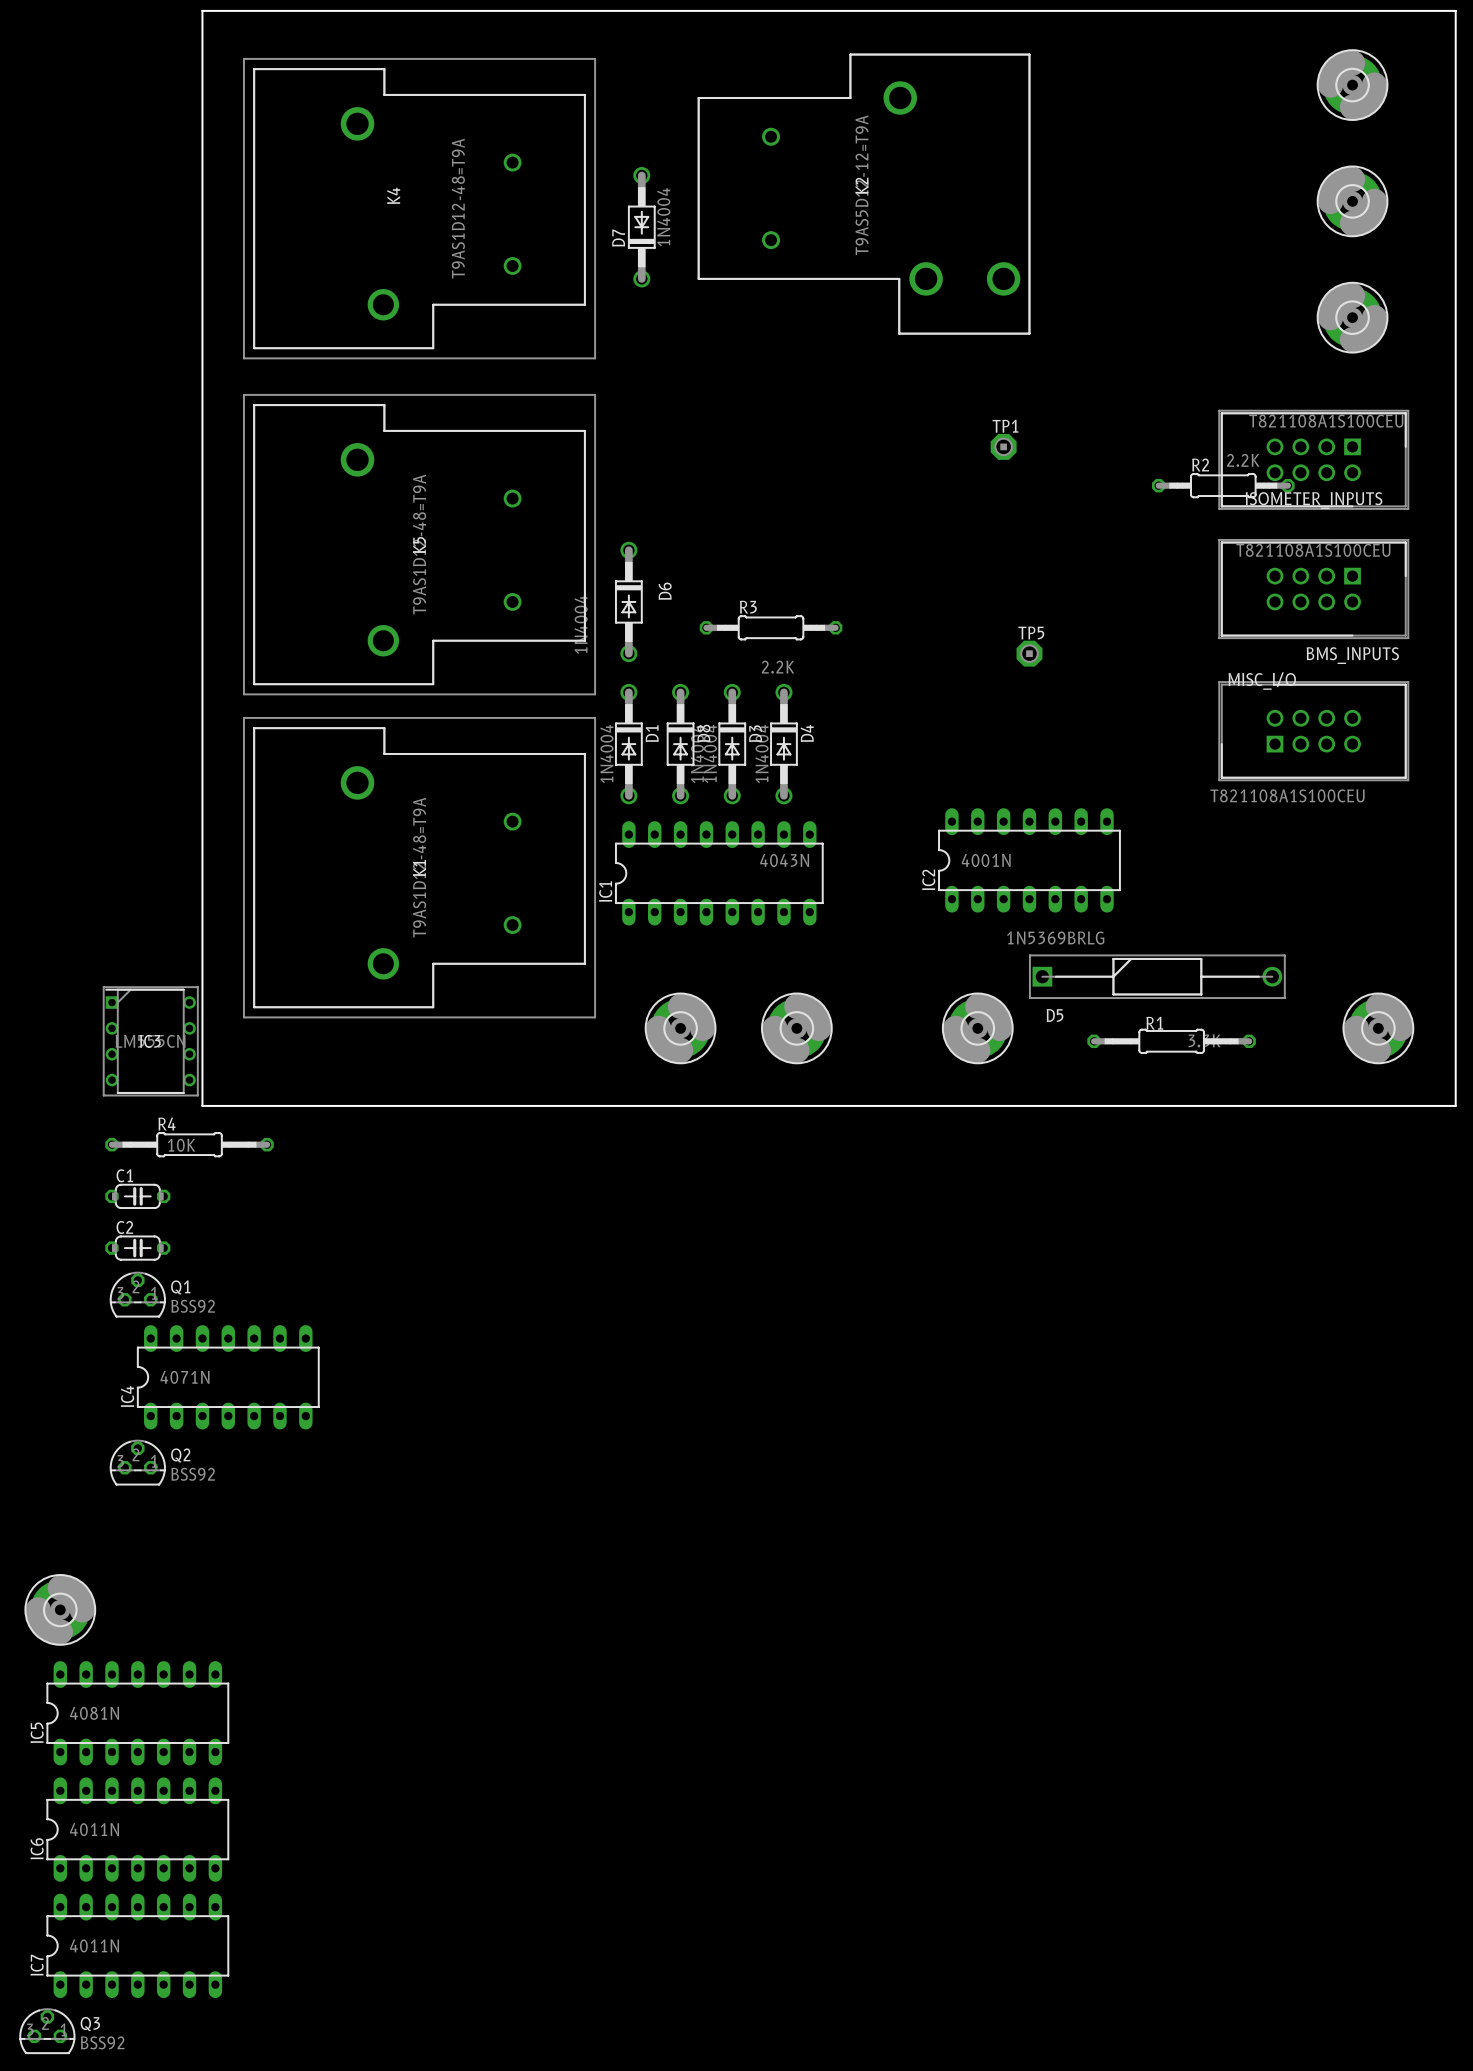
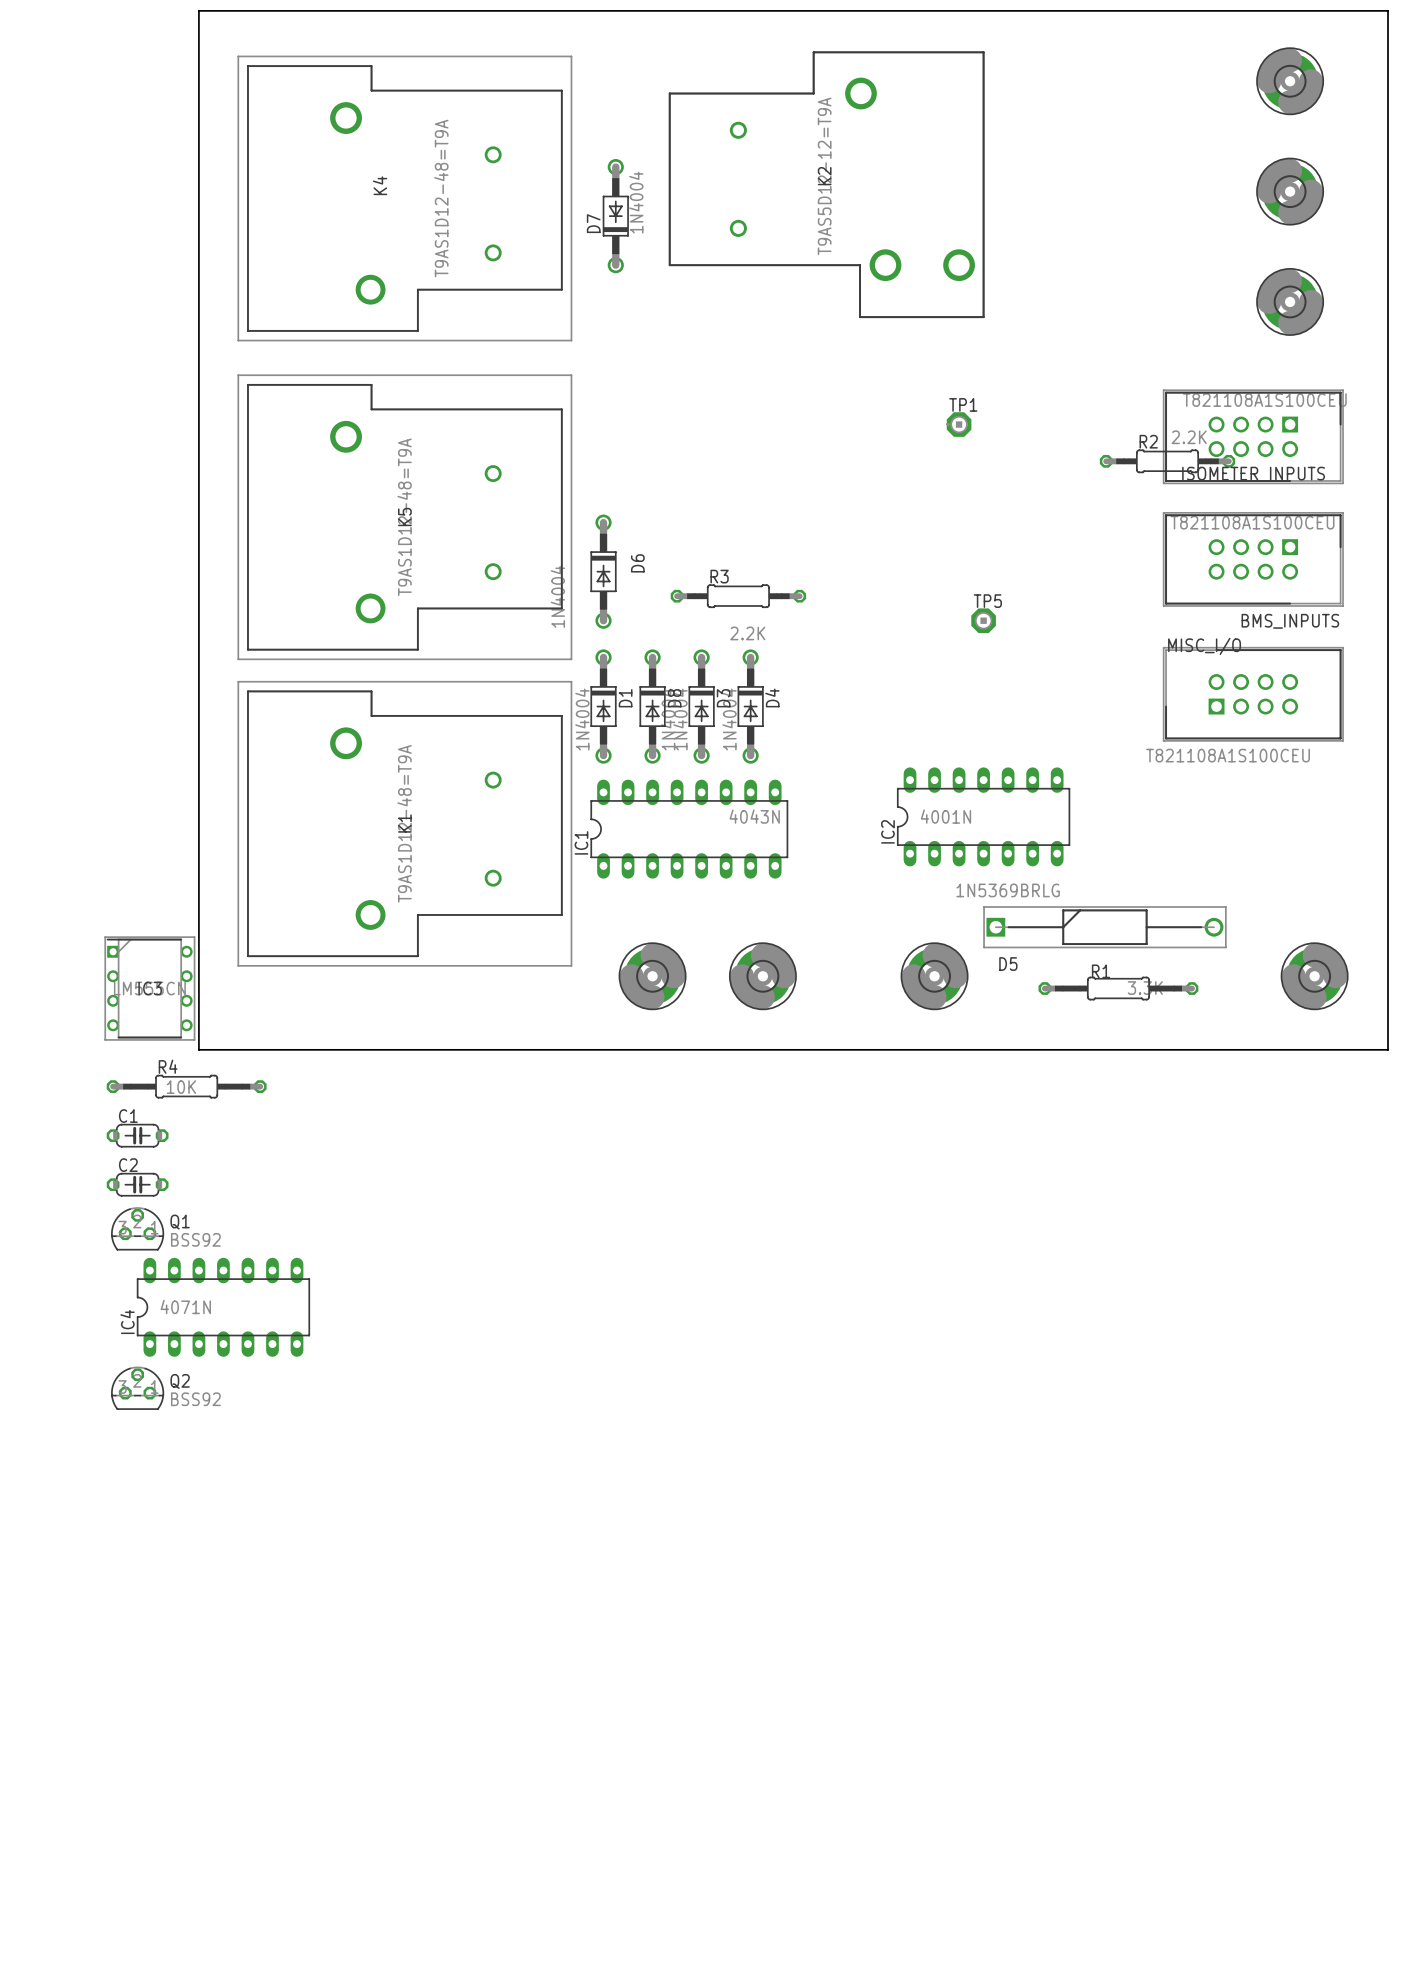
part: (60, 1609) -> none
IC5: 4081N (137, 1713) -> none
IC6: 4011N (137, 1829) -> none
IC7: 4011N (137, 1945) -> none
Q3: BSS92 (47, 2031) -> none

